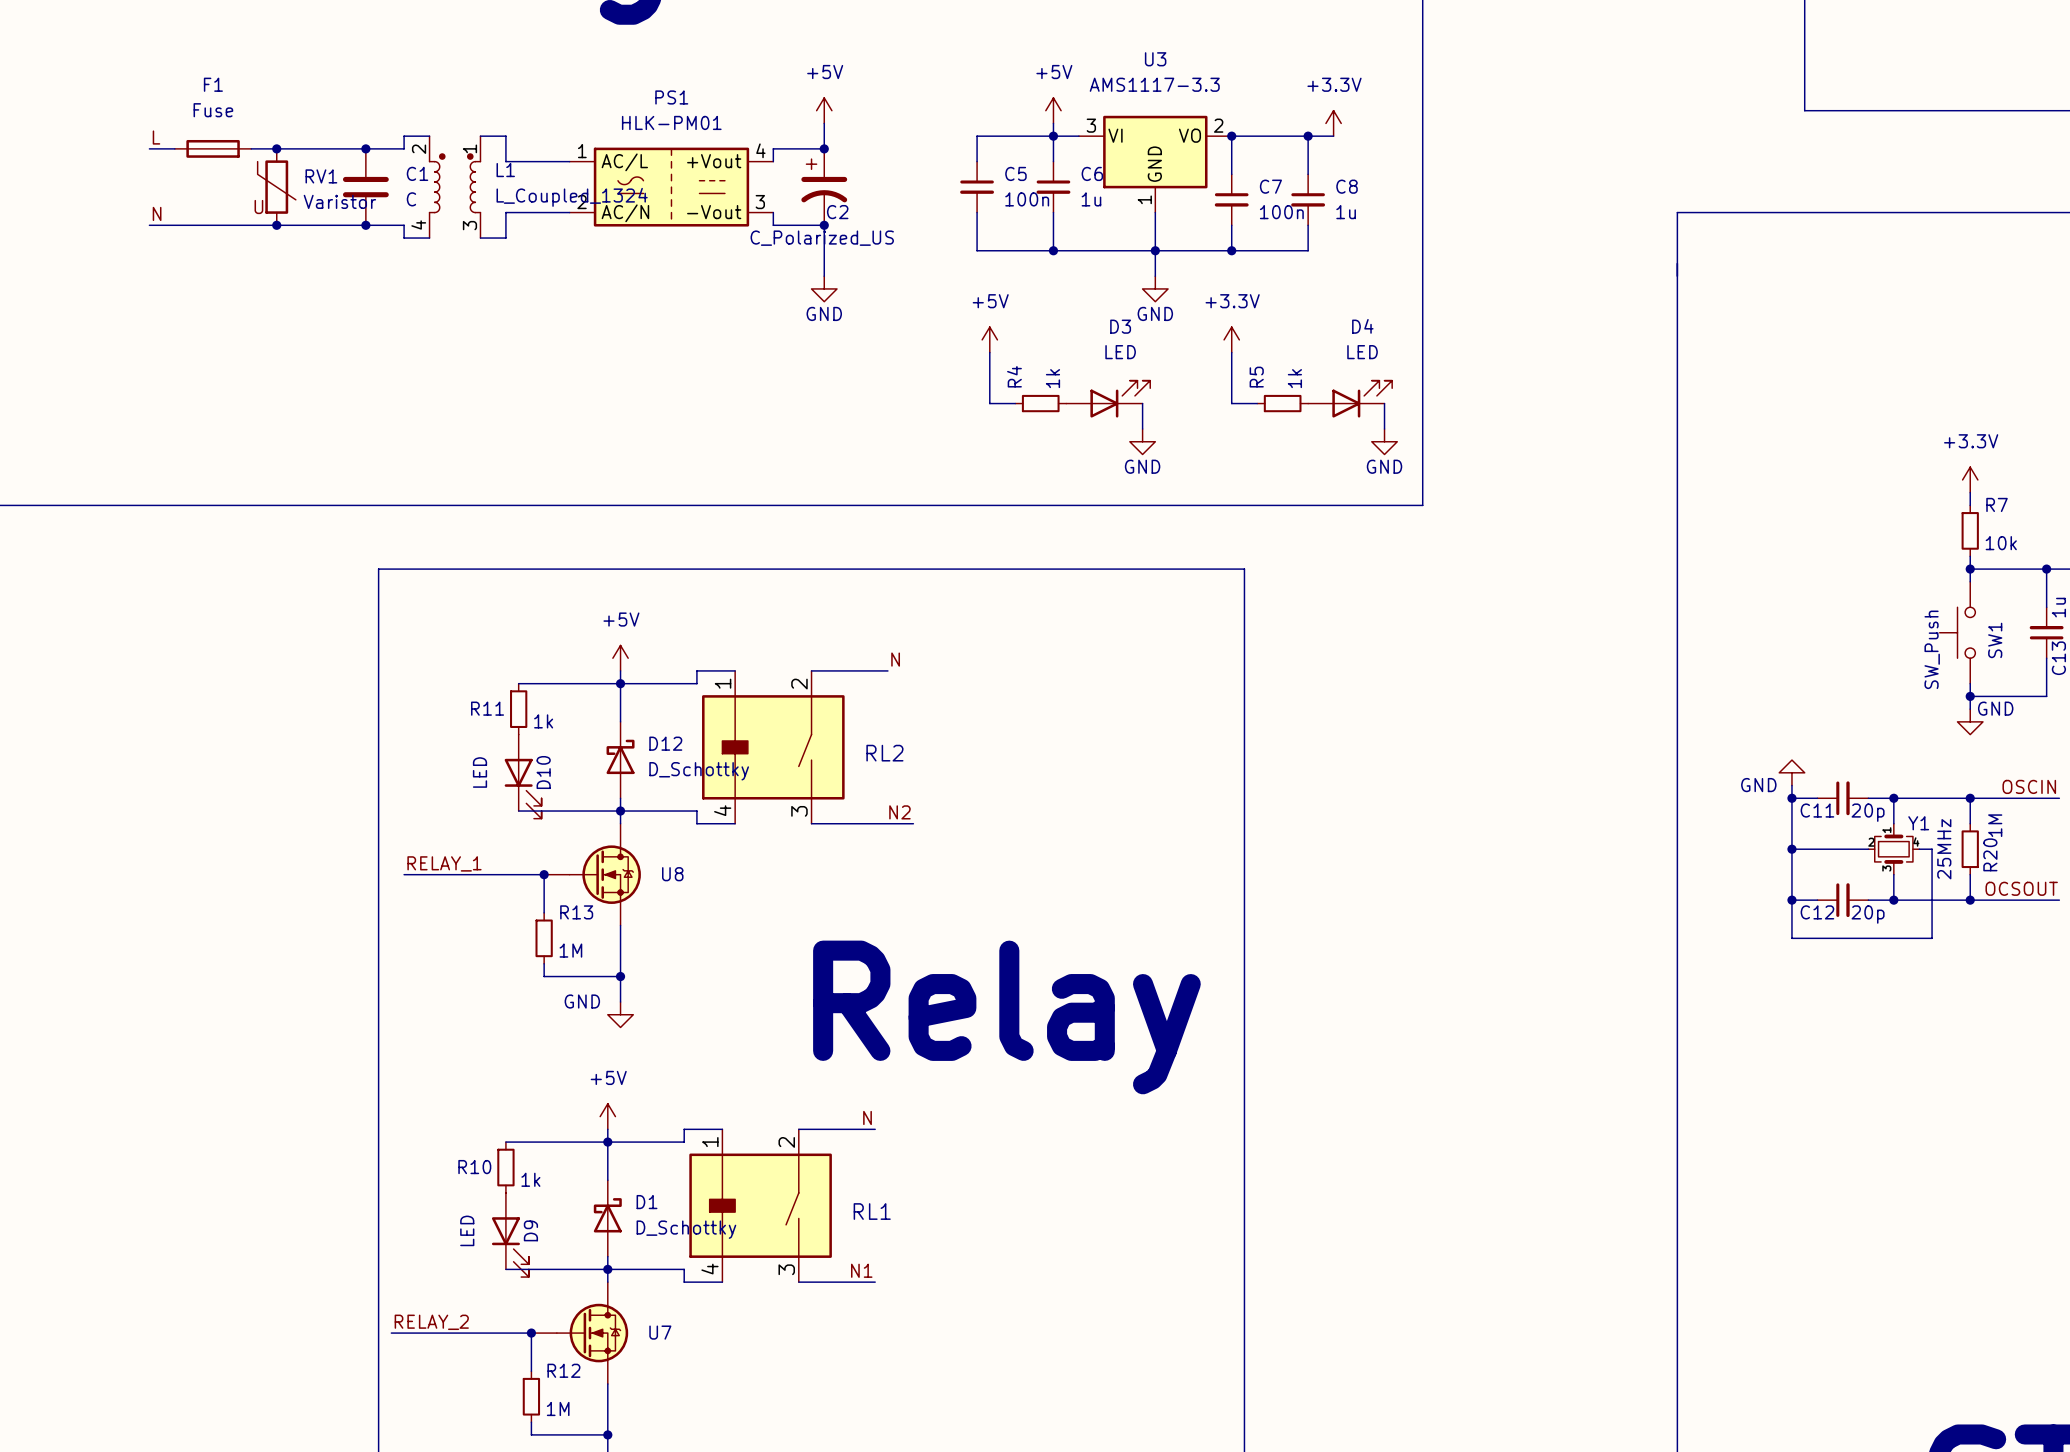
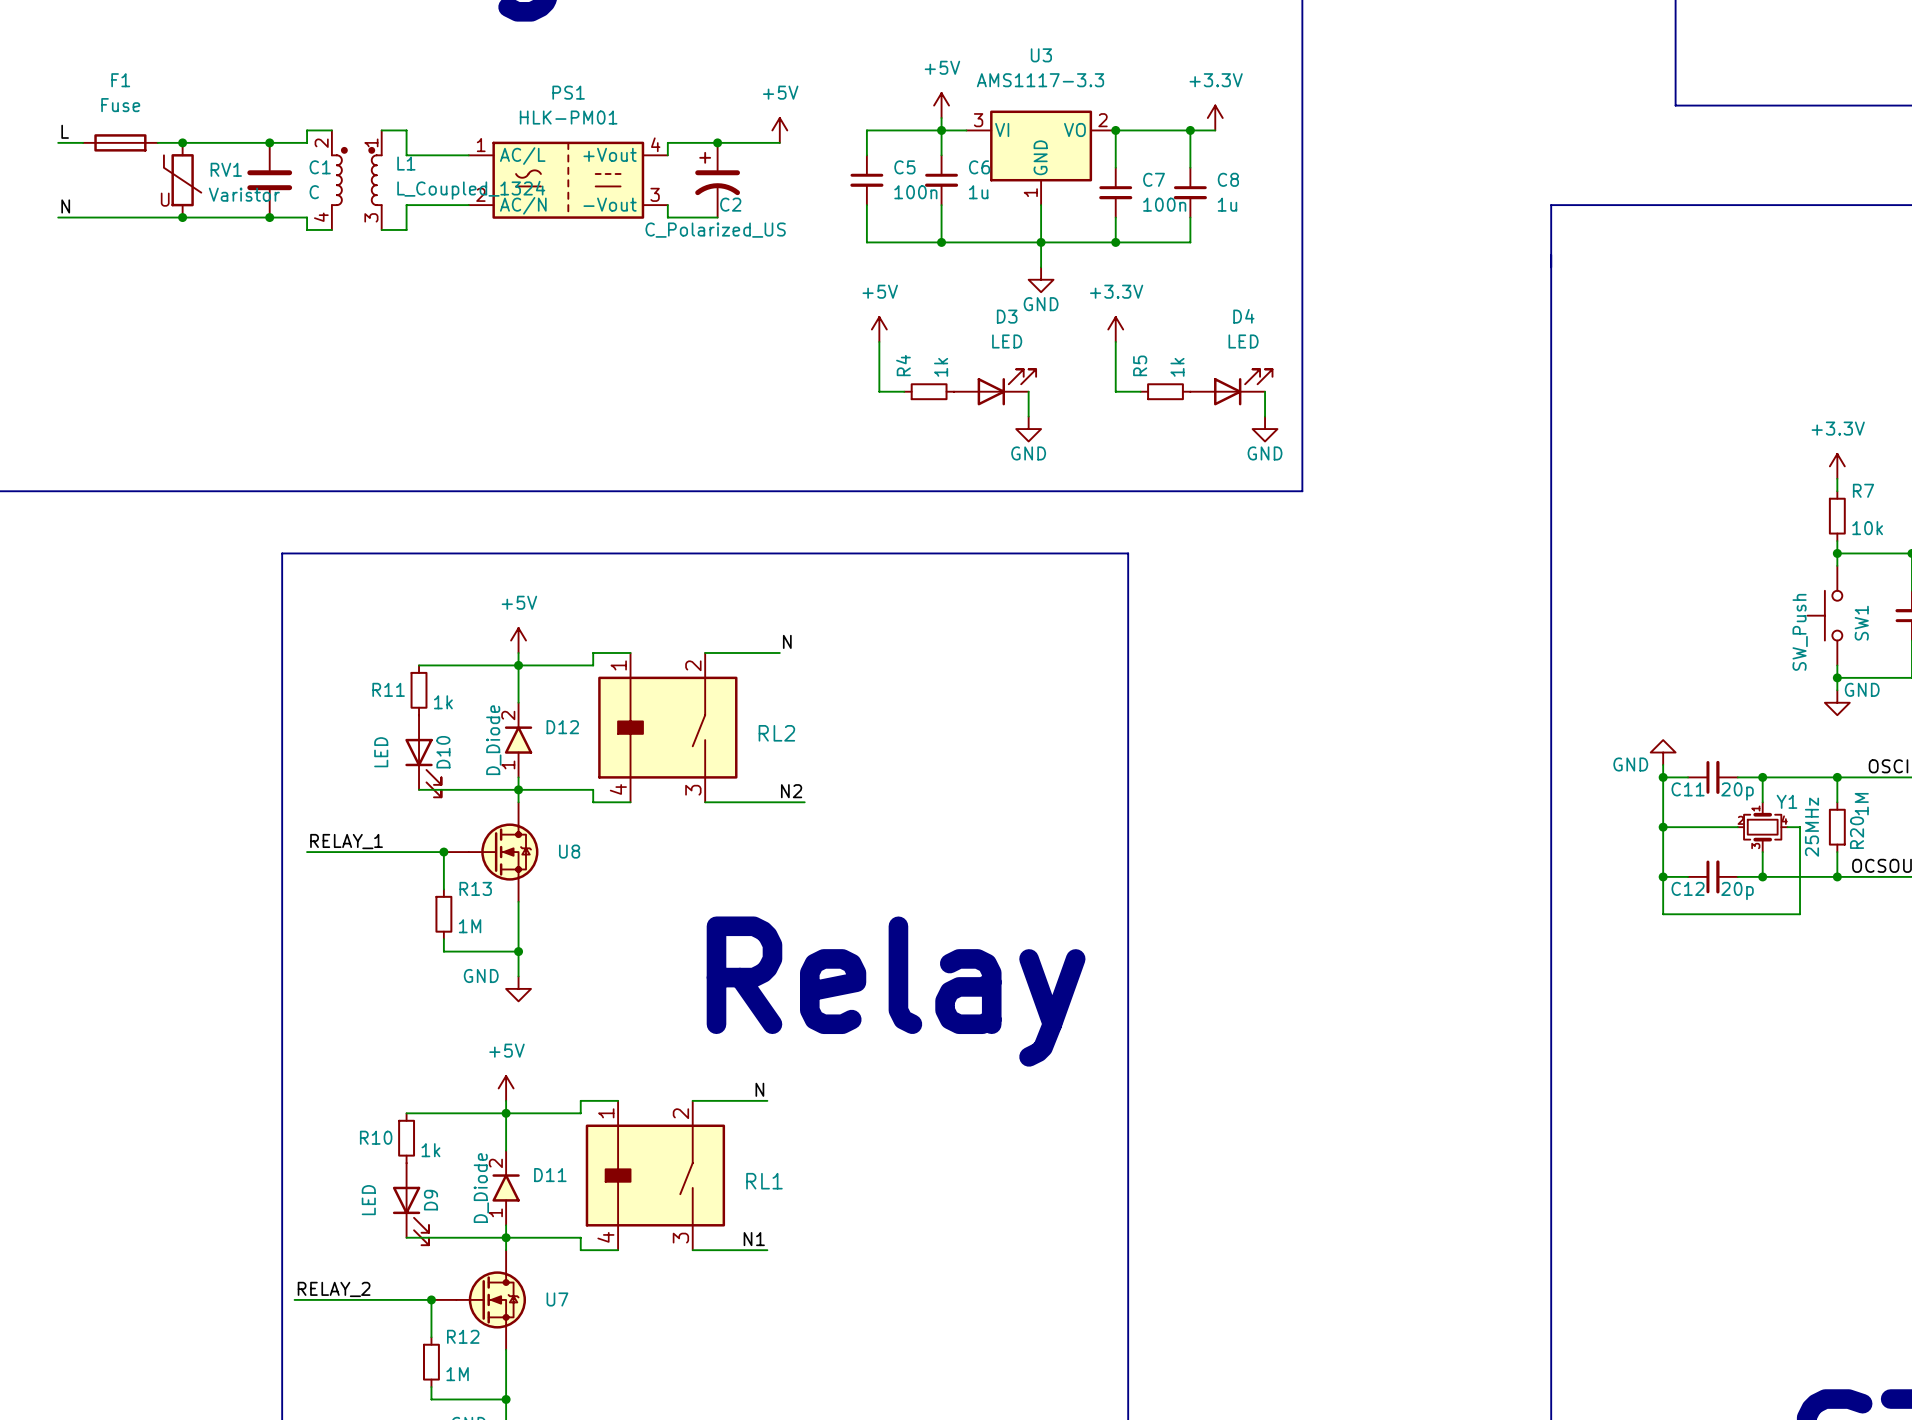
power symbol position: +5V (824, 110) -> +5V (779, 130)
wire: (824, 123) (824, 148) -> (779, 142) (717, 142)
wire: (824, 225) (824, 276) -> none
junction: (824, 225) -> none
power symbol: GND (824, 288) -> none
D12 symbol: [606, 721, 635, 799] -> [504, 702, 533, 778]
D12 value: D_Schottky (699, 771) -> D_Diode (493, 740)
D1: D_Schottky (607, 1218) -> none
D11: none -> D_Diode (506, 1187)

